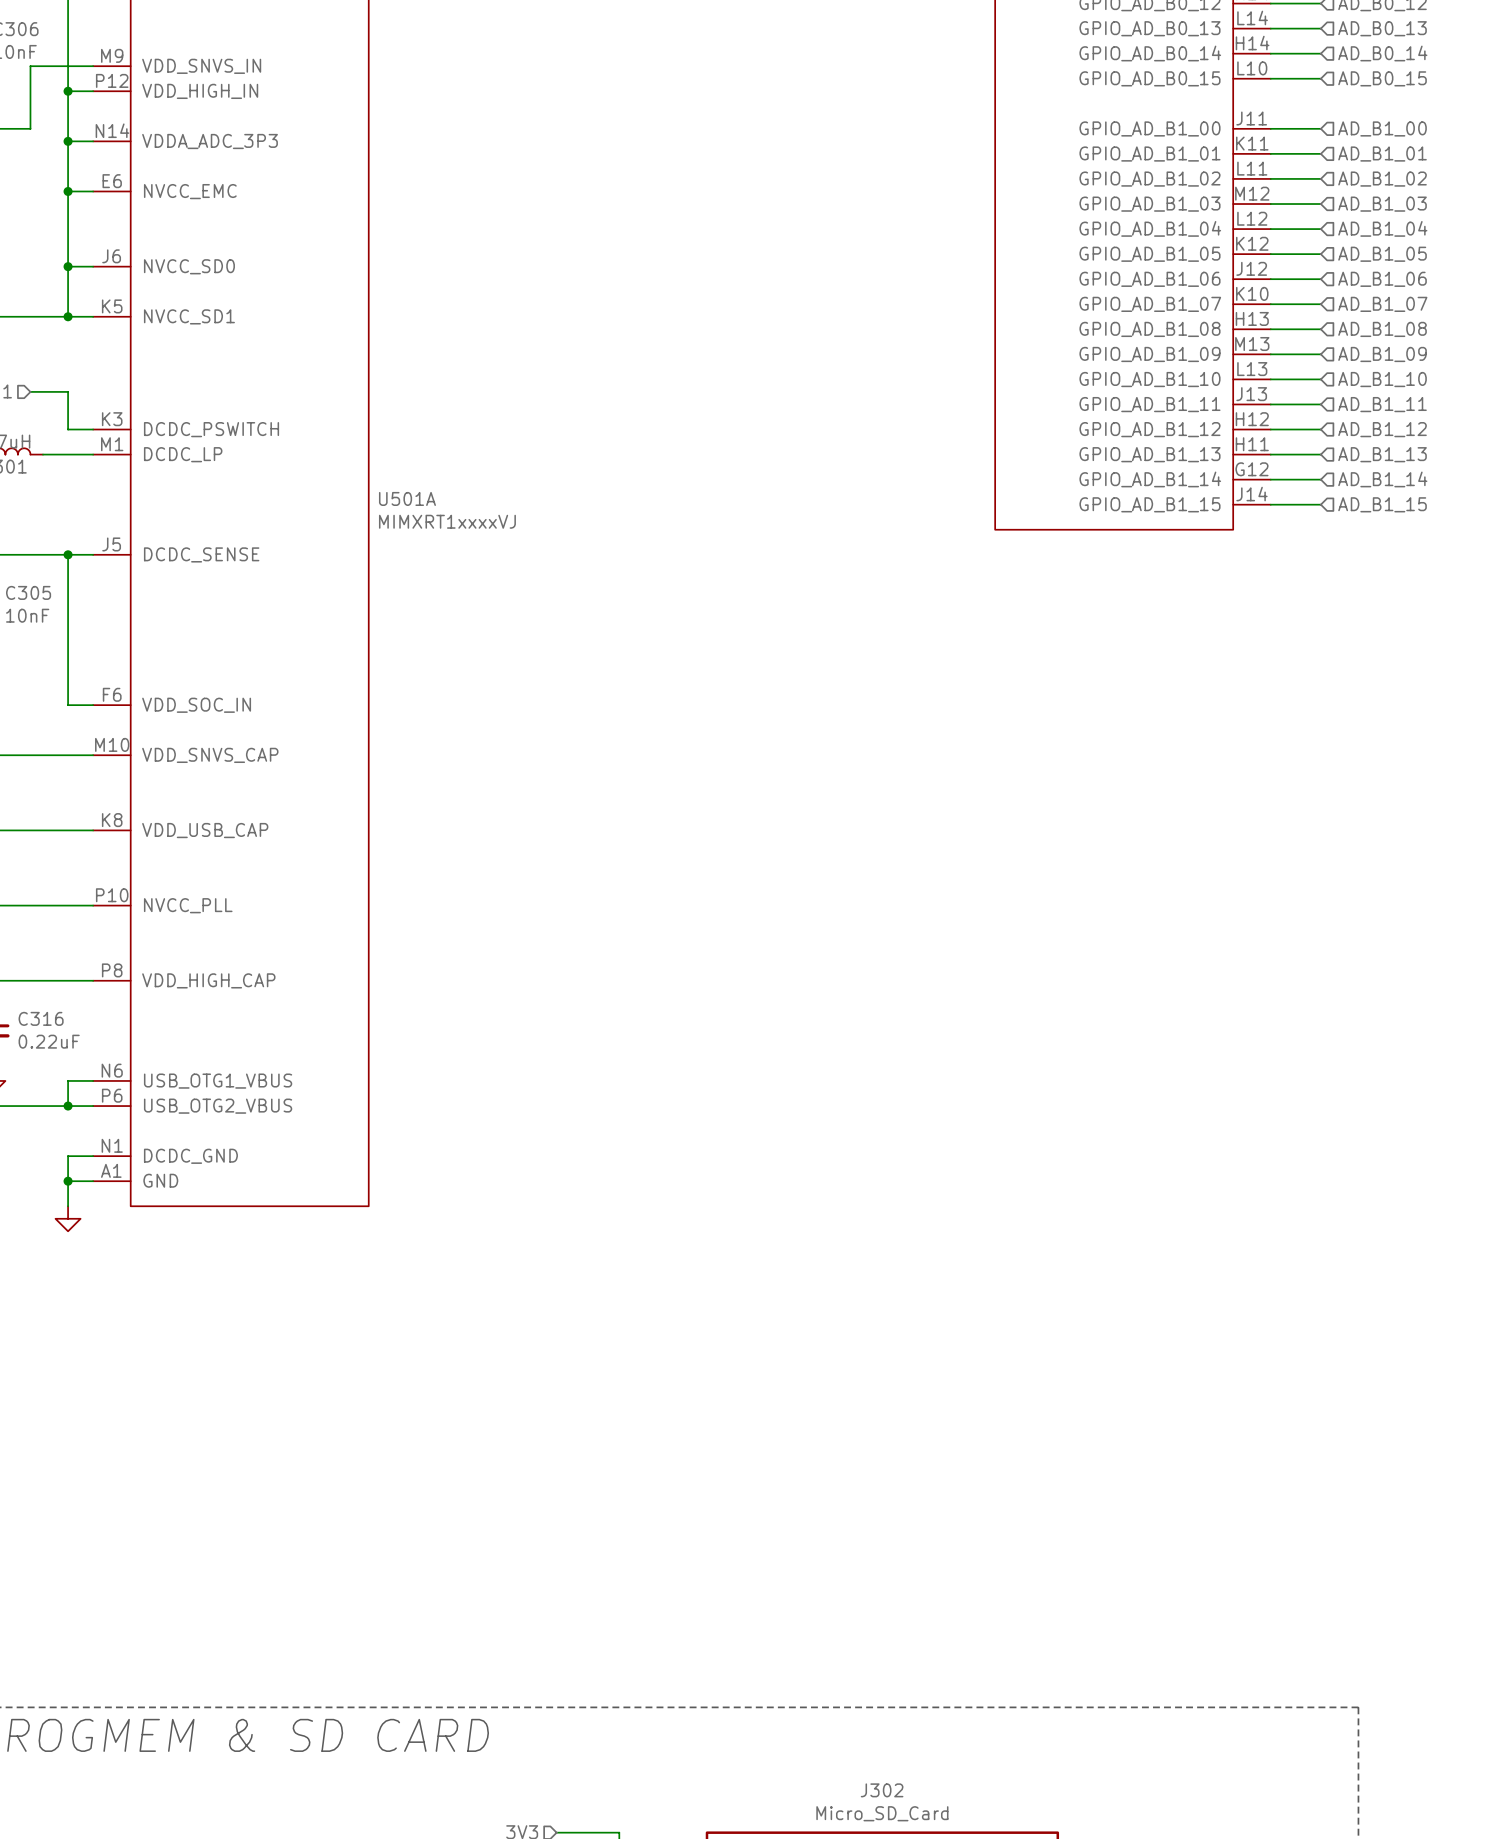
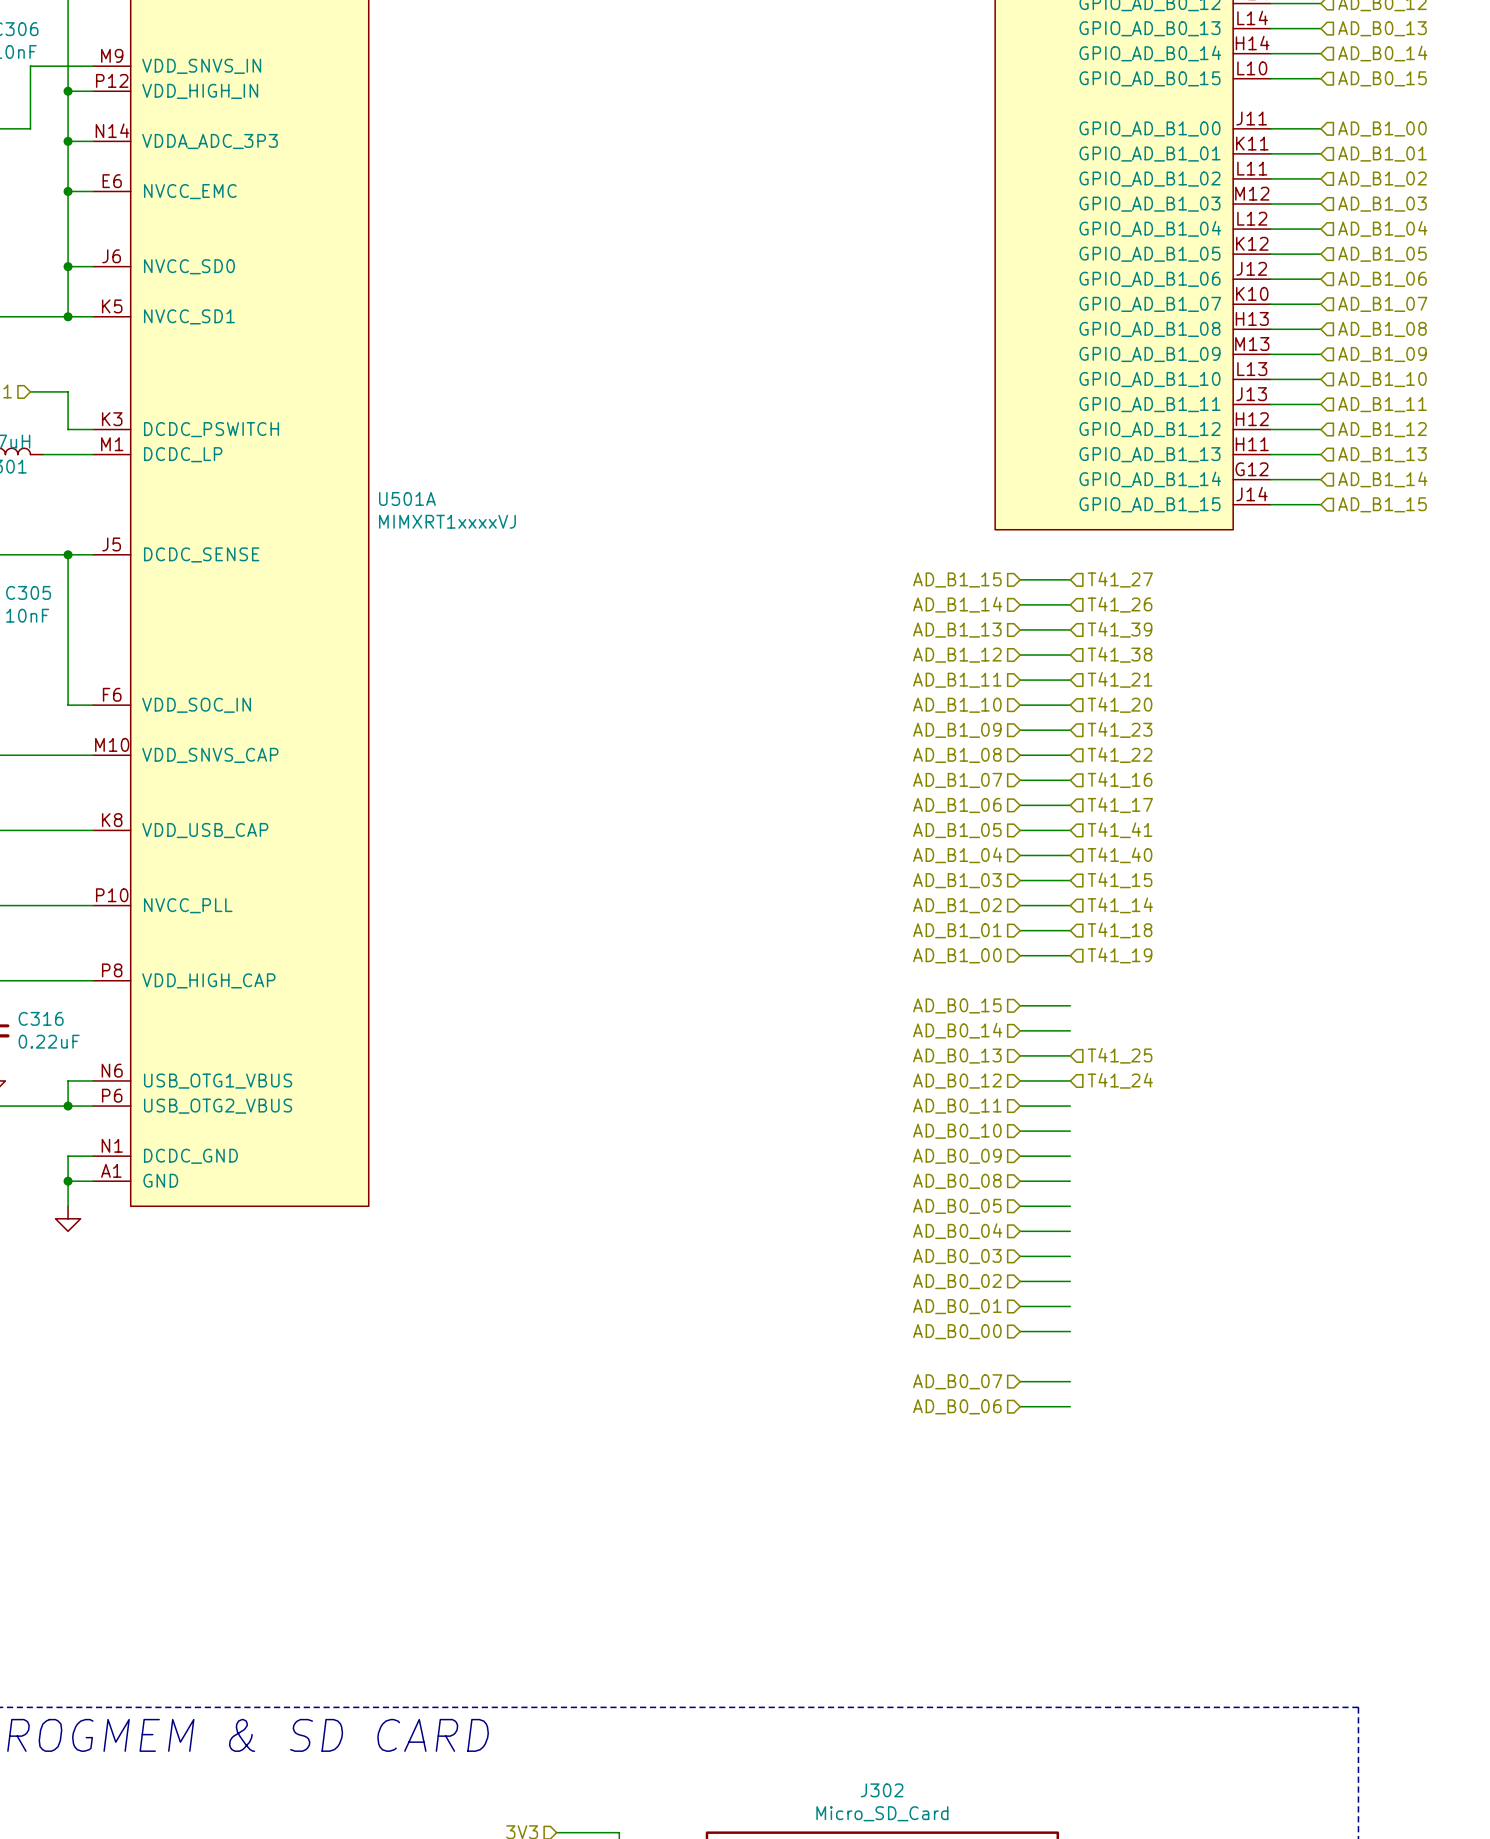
hierarchical label: none -> AD_B1_15 (957, 579)
wire: none -> (1020, 579) (1070, 579)
hierarchical label: none -> T41_27 (1120, 579)
hierarchical label: none -> AD_B1_14 (957, 604)
wire: none -> (1020, 604) (1070, 604)
hierarchical label: none -> T41_26 (1120, 604)
wire: none -> (1020, 629) (1070, 629)
hierarchical label: none -> T41_39 (1120, 629)
hierarchical label: none -> AD_B1_13 (957, 630)
hierarchical label: none -> T41_38 (1120, 654)
hierarchical label: none -> AD_B1_12 (957, 655)
wire: none -> (1020, 655) (1070, 655)
hierarchical label: none -> T41_21 (1120, 679)
hierarchical label: none -> AD_B1_11 (957, 680)
wire: none -> (1020, 680) (1070, 680)
hierarchical label: none -> T41_20 (1120, 704)
hierarchical label: none -> AD_B1_10 (957, 705)
wire: none -> (1020, 705) (1070, 705)
hierarchical label: none -> AD_B1_09 (957, 730)
wire: none -> (1020, 730) (1070, 730)
hierarchical label: none -> T41_23 (1120, 730)
hierarchical label: none -> AD_B1_08 (957, 755)
wire: none -> (1020, 755) (1070, 755)
hierarchical label: none -> T41_22 (1120, 755)
hierarchical label: none -> AD_B1_07 (957, 780)
wire: none -> (1020, 780) (1070, 780)
hierarchical label: none -> T41_16 (1120, 780)
hierarchical label: none -> AD_B1_06 (957, 805)
wire: none -> (1020, 805) (1070, 805)
hierarchical label: none -> T41_17 (1120, 805)
hierarchical label: none -> AD_B1_05 (957, 830)
wire: none -> (1020, 830) (1070, 830)
hierarchical label: none -> T41_41 (1120, 830)
hierarchical label: none -> AD_B1_04 (957, 855)
wire: none -> (1020, 855) (1070, 855)
hierarchical label: none -> T41_40 (1120, 855)
hierarchical label: none -> AD_B1_03 (957, 880)
wire: none -> (1020, 880) (1070, 880)
hierarchical label: none -> T41_15 (1120, 880)
hierarchical label: none -> AD_B1_02 (957, 905)
wire: none -> (1020, 905) (1070, 905)
hierarchical label: none -> T41_14 (1120, 905)
hierarchical label: none -> AD_B1_01 (957, 930)
wire: none -> (1020, 930) (1070, 930)
hierarchical label: none -> T41_18 (1120, 930)
hierarchical label: none -> AD_B1_00 (957, 955)
wire: none -> (1020, 955) (1070, 955)
hierarchical label: none -> T41_19 (1120, 955)
hierarchical label: none -> AD_B0_15 (957, 1005)
wire: none -> (1020, 1005) (1070, 1005)
hierarchical label: none -> AD_B0_14 (957, 1030)
wire: none -> (1020, 1030) (1070, 1030)
wire: none -> (1020, 1055) (1070, 1055)
hierarchical label: none -> T41_25 (1120, 1055)
hierarchical label: none -> AD_B0_13 (957, 1056)
wire: none -> (1020, 1080) (1070, 1080)
hierarchical label: none -> T41_24 (1120, 1080)
hierarchical label: none -> AD_B0_12 (957, 1081)
hierarchical label: none -> AD_B0_11 (957, 1106)
wire: none -> (1020, 1106) (1070, 1106)
hierarchical label: none -> AD_B0_10 (957, 1131)
wire: none -> (1020, 1131) (1070, 1131)
hierarchical label: none -> AD_B0_09 (957, 1156)
wire: none -> (1020, 1156) (1070, 1156)
hierarchical label: none -> AD_B0_08 (957, 1181)
wire: none -> (1020, 1181) (1070, 1181)
hierarchical label: none -> AD_B0_05 (957, 1206)
wire: none -> (1020, 1206) (1070, 1206)
hierarchical label: none -> AD_B0_04 (957, 1231)
wire: none -> (1020, 1231) (1070, 1231)
hierarchical label: none -> AD_B0_03 (957, 1256)
wire: none -> (1020, 1256) (1070, 1256)
hierarchical label: none -> AD_B0_02 (957, 1281)
wire: none -> (1020, 1281) (1070, 1281)
hierarchical label: none -> AD_B0_01 (957, 1306)
wire: none -> (1020, 1306) (1070, 1306)
hierarchical label: none -> AD_B0_00 (957, 1331)
wire: none -> (1020, 1331) (1070, 1331)
hierarchical label: none -> AD_B0_07 (957, 1381)
wire: none -> (1020, 1381) (1070, 1381)
hierarchical label: none -> AD_B0_06 (957, 1406)
wire: none -> (1020, 1406) (1070, 1406)

